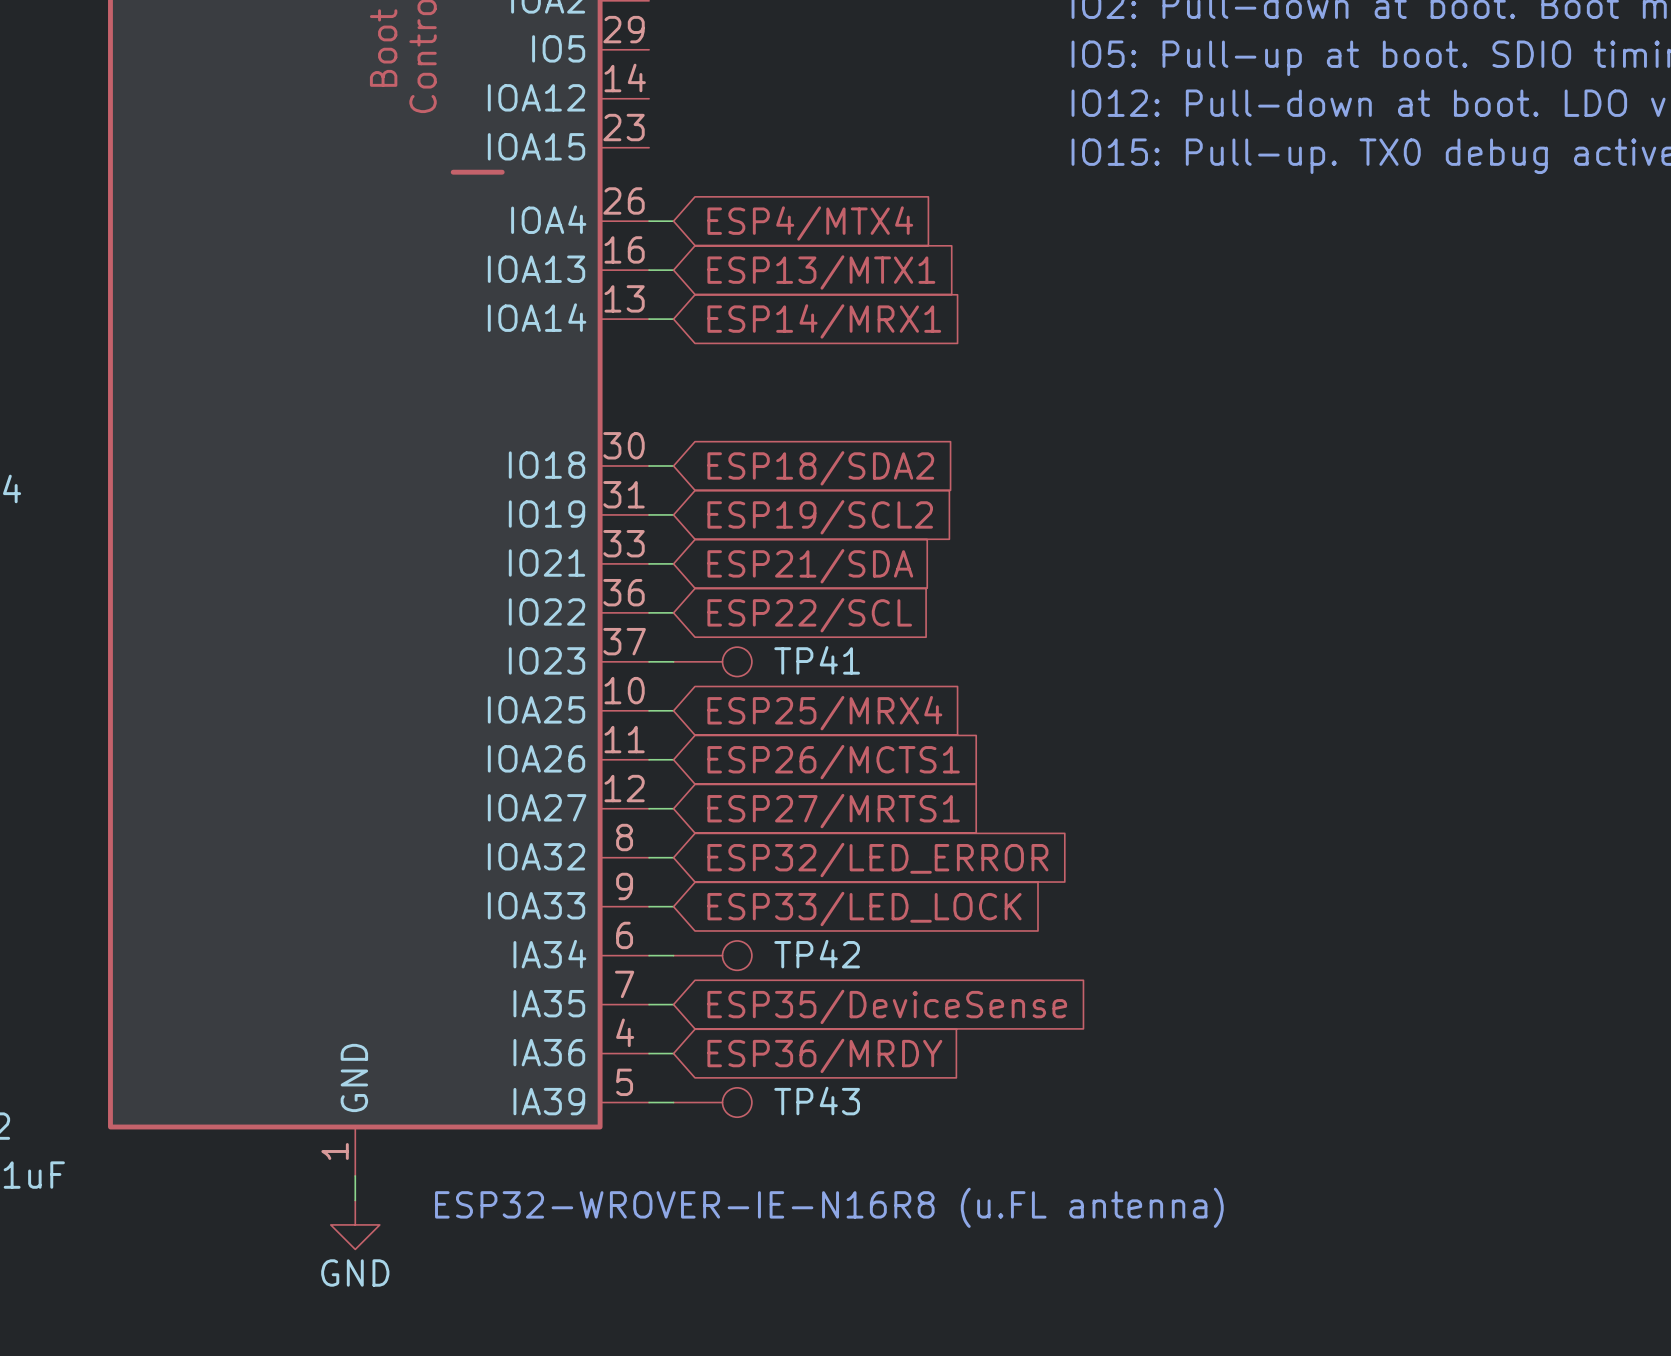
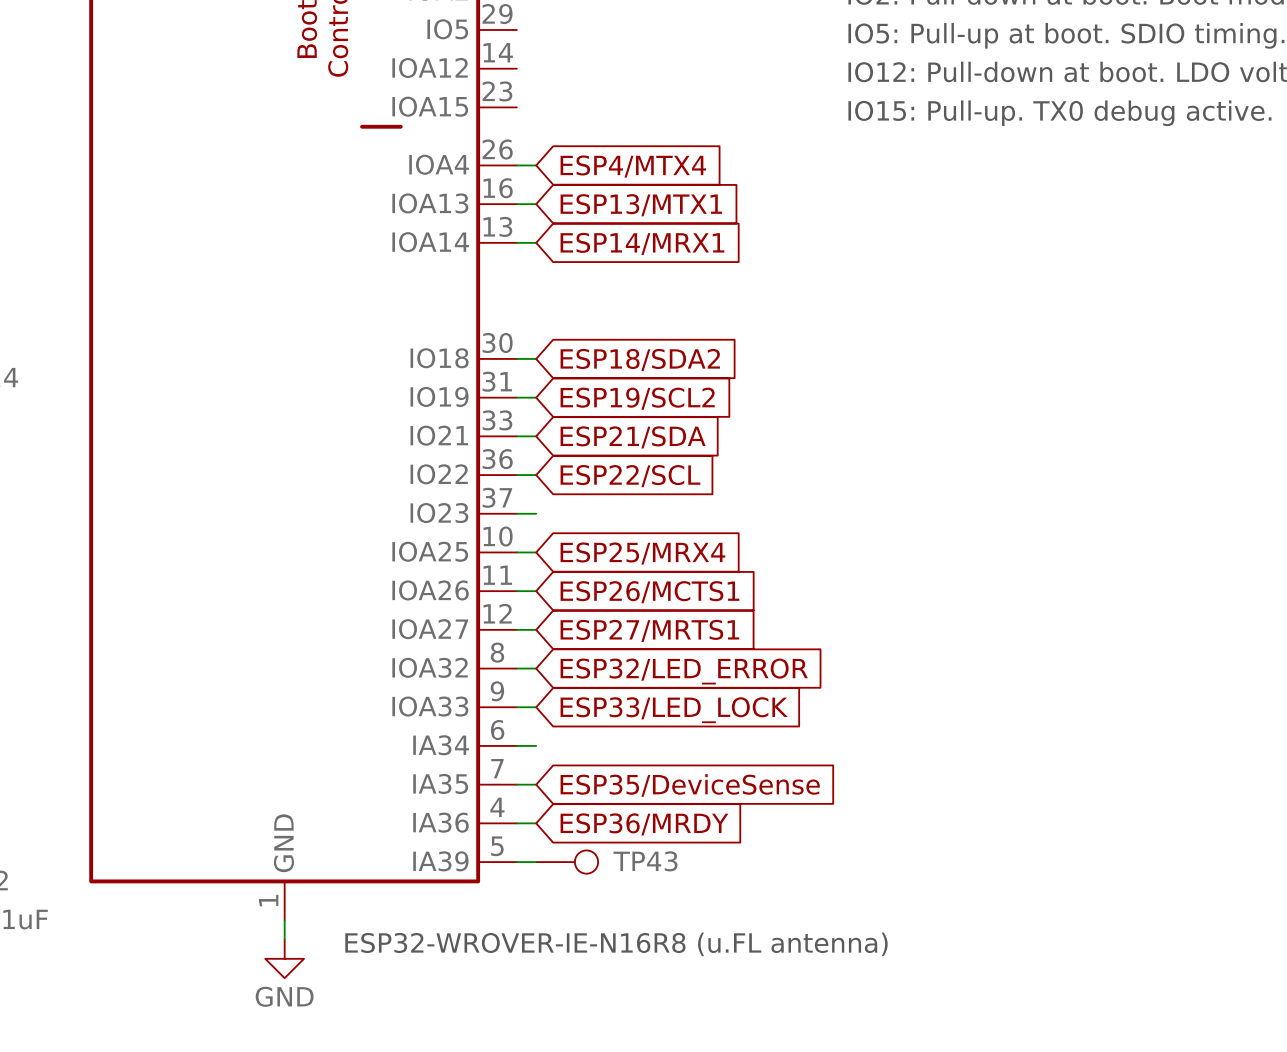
TP41: (712, 661) -> none
TP42: (712, 955) -> none

